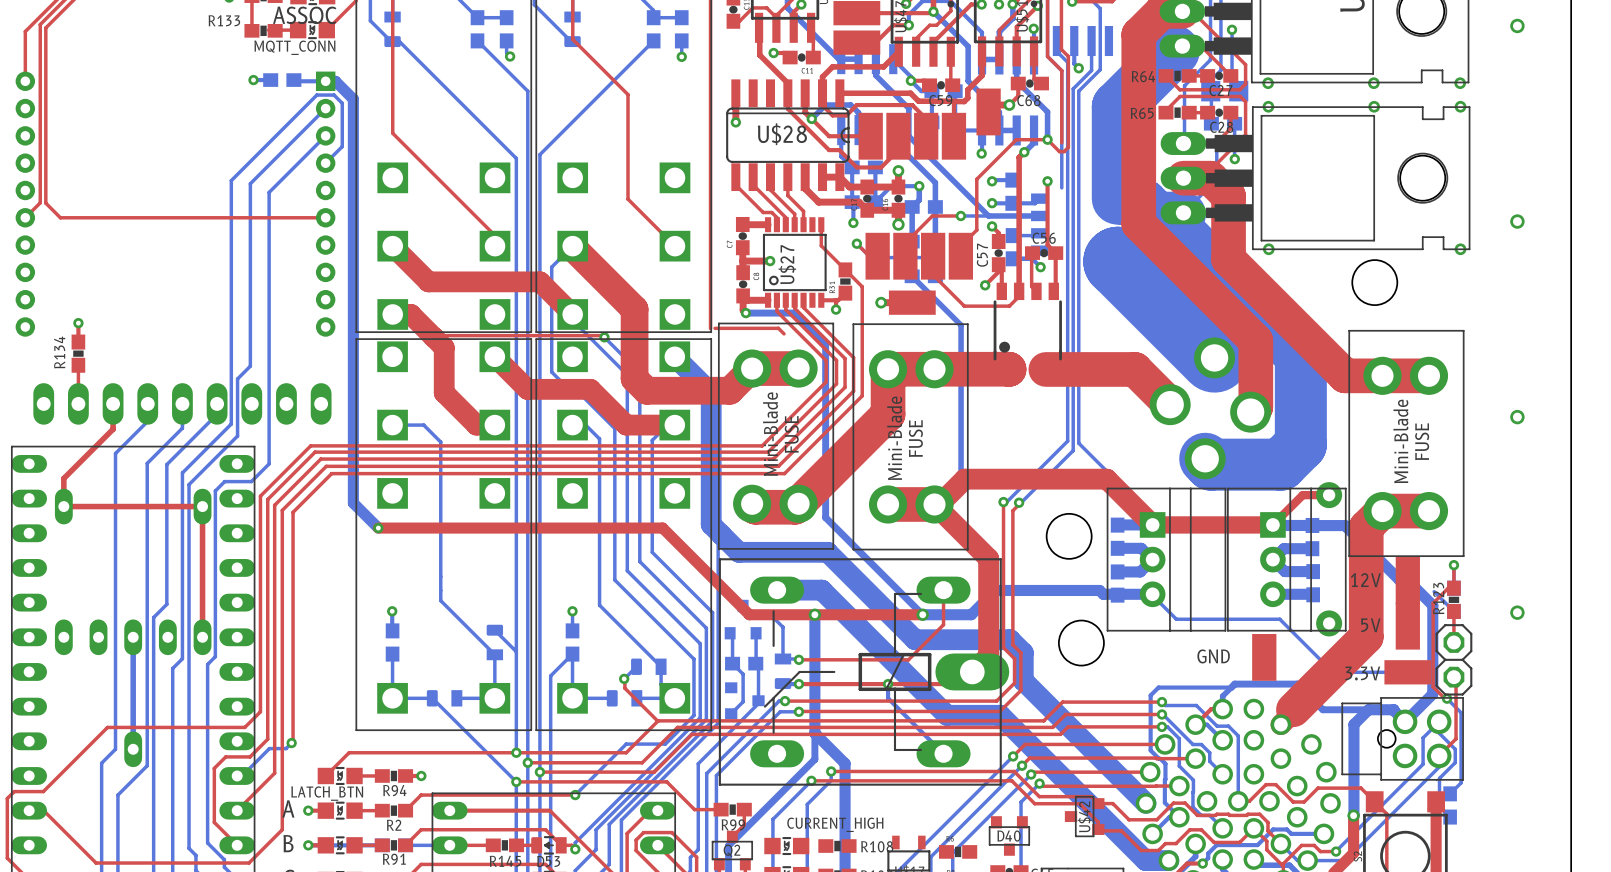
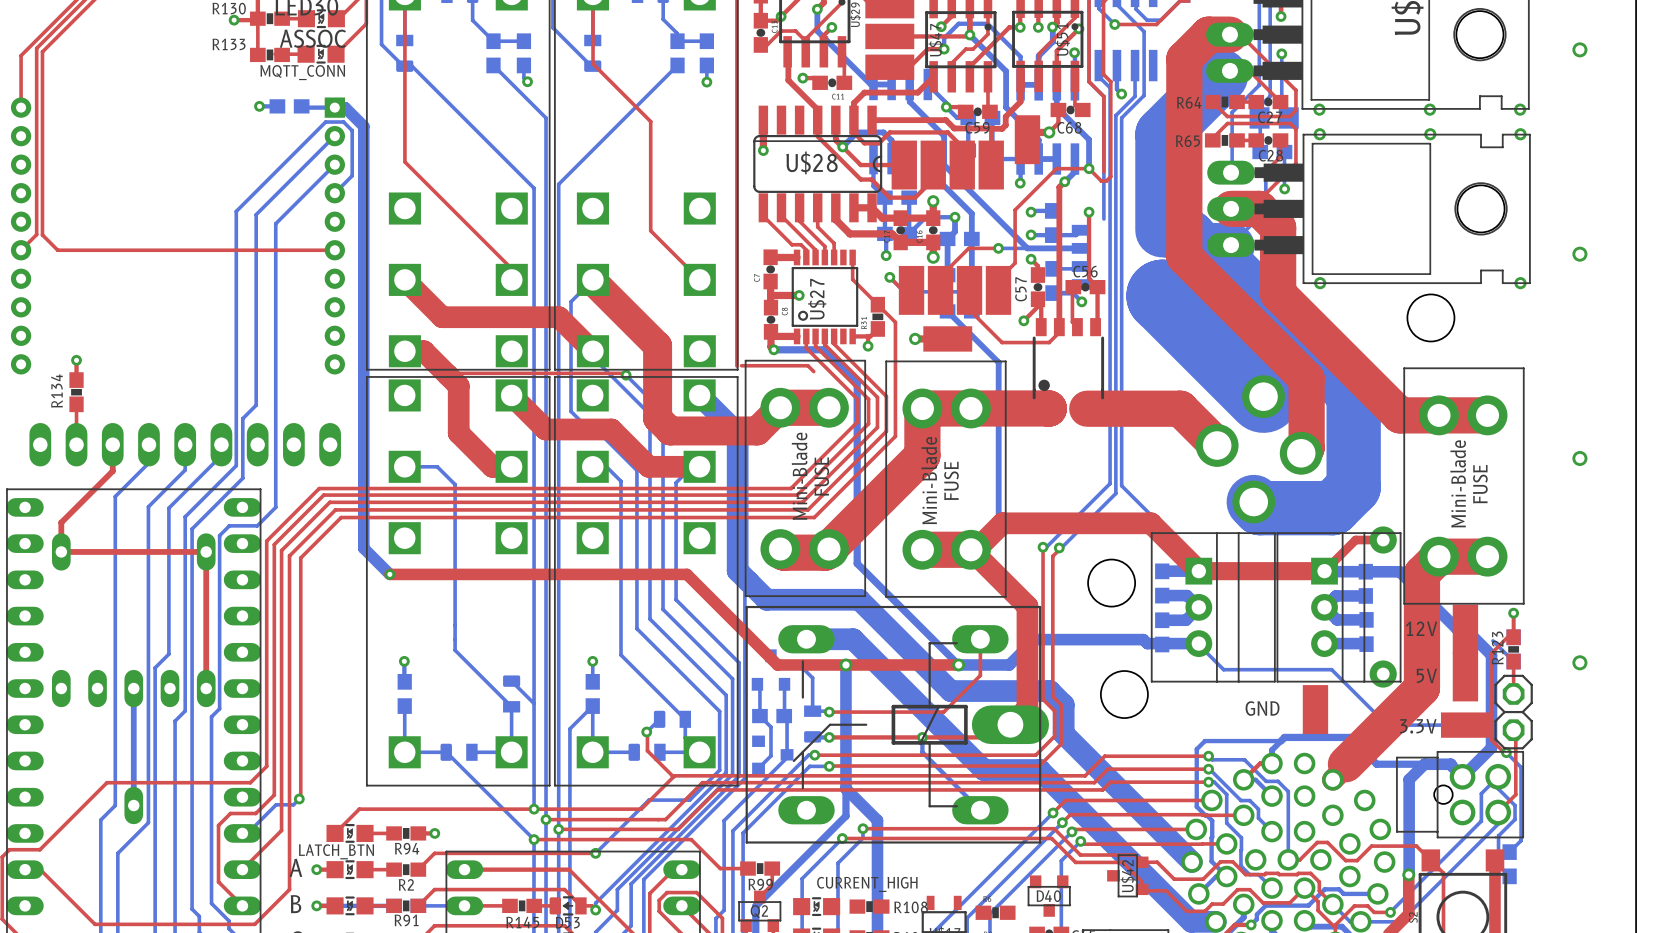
top track: (624, 688) (657, 720) -> (672, 775) (681, 775)
top track: (658, 720) (626, 752) (618, 752) -> (647, 741) (647, 750) (673, 776) (641, 809)

